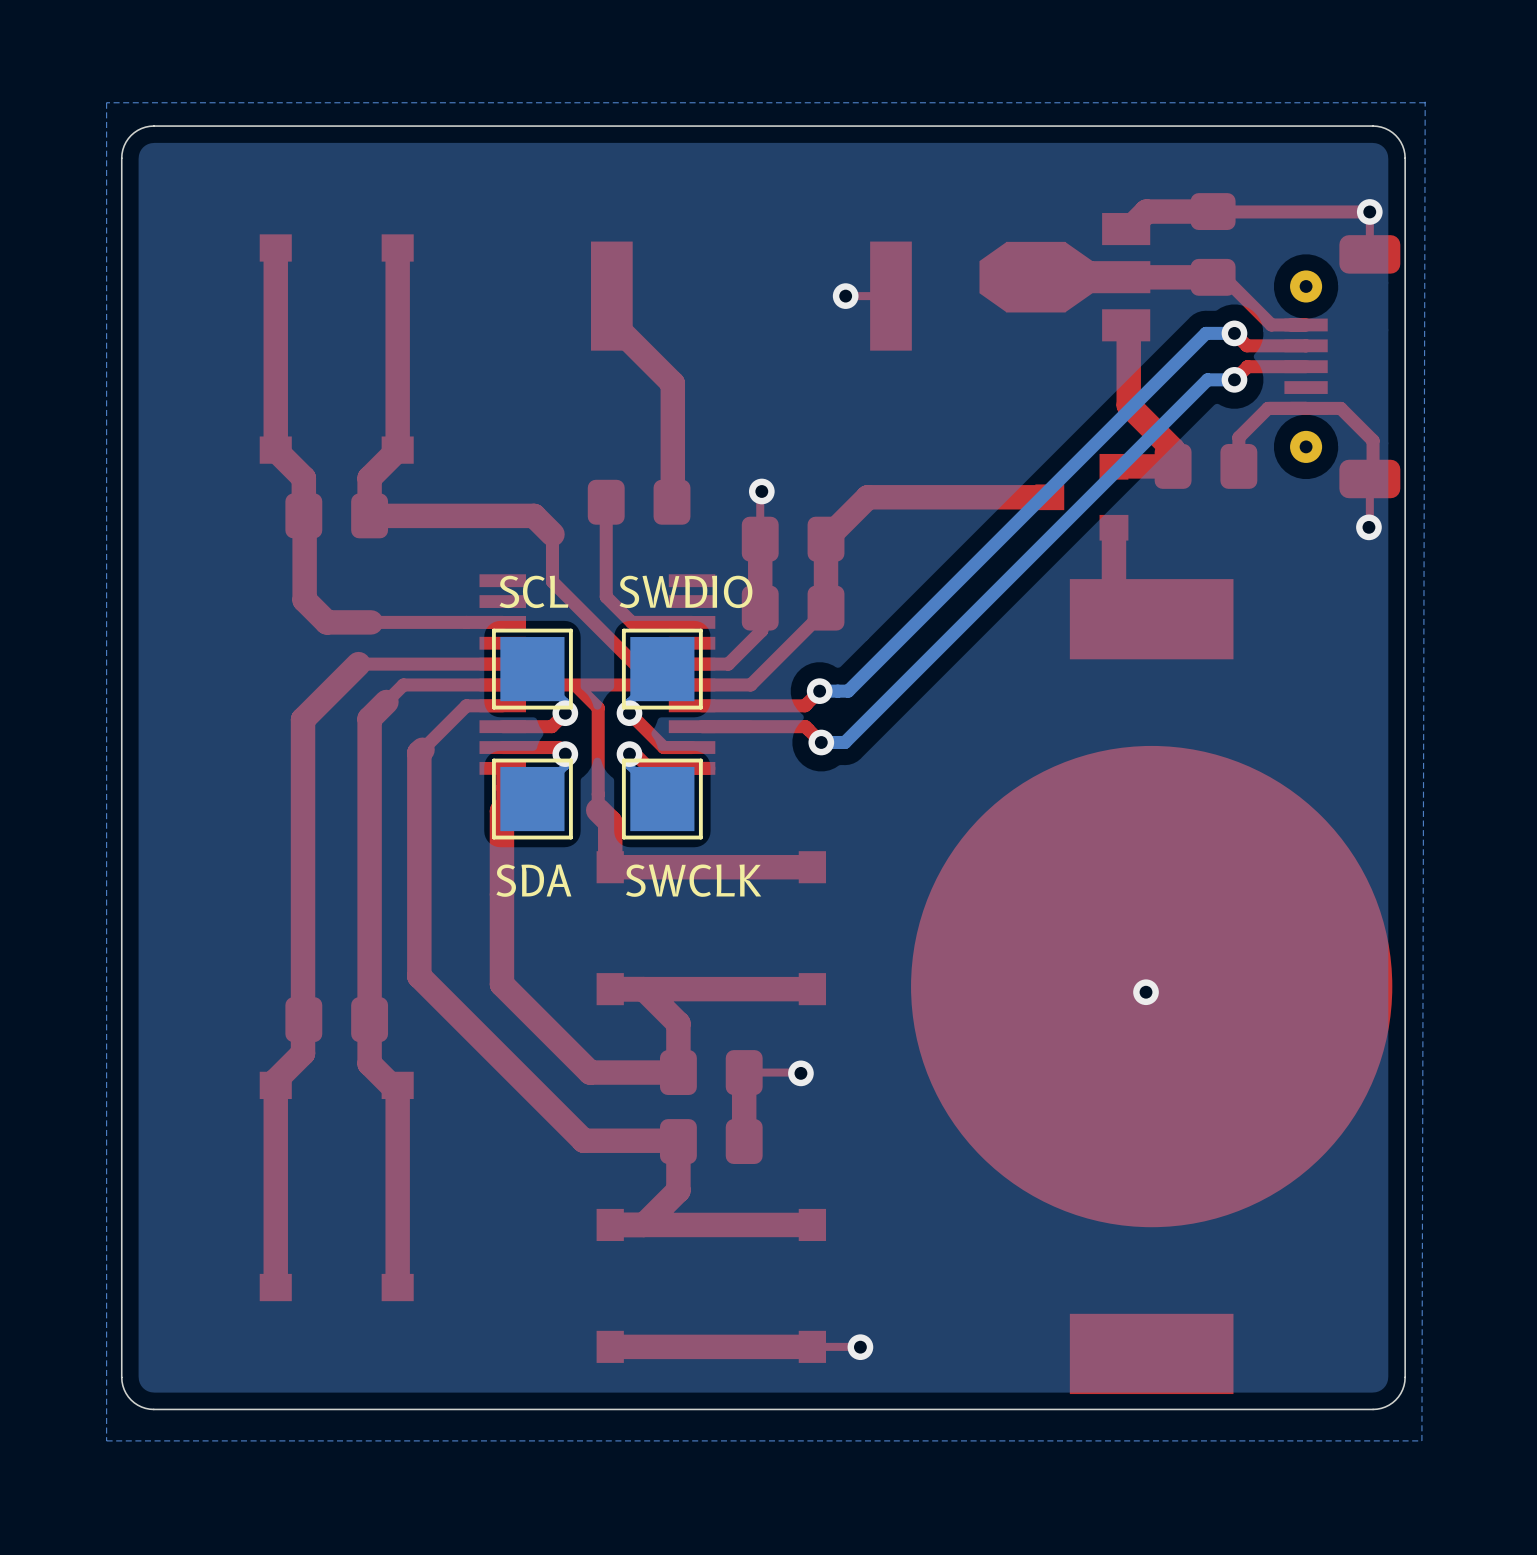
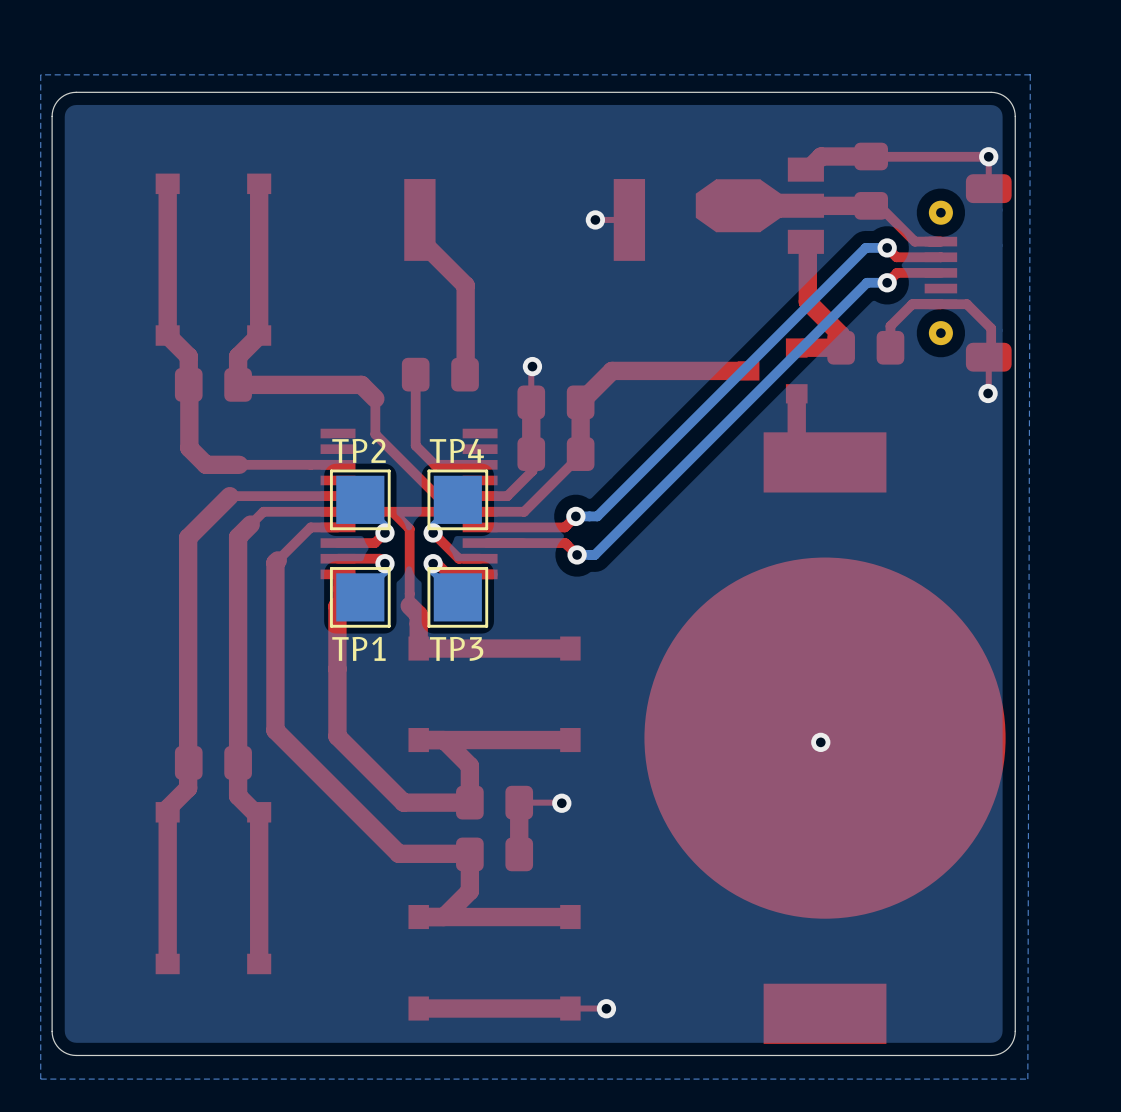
SCL name: SCL (533, 591) -> TP2 (359, 450)
SWDIO name: SWDIO (685, 591) -> TP4 (456, 450)
SDA name: SDA (533, 880) -> TP1 (358, 648)
SWCLK name: SWCLK (693, 880) -> TP3 (456, 648)

